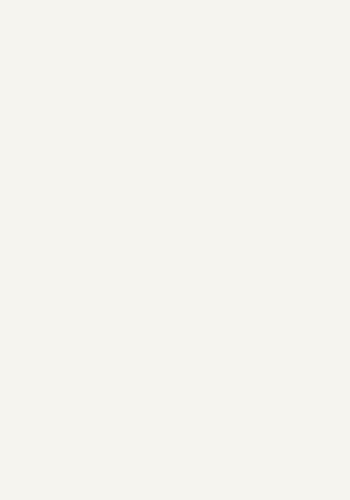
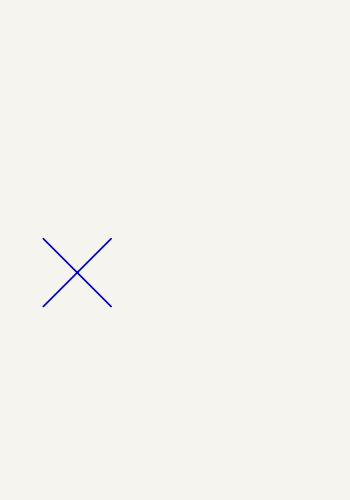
no-connect mark: none -> (77, 272)

